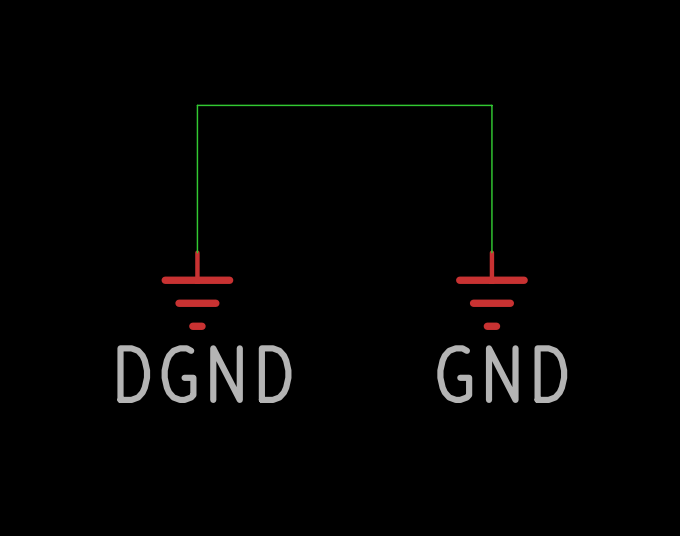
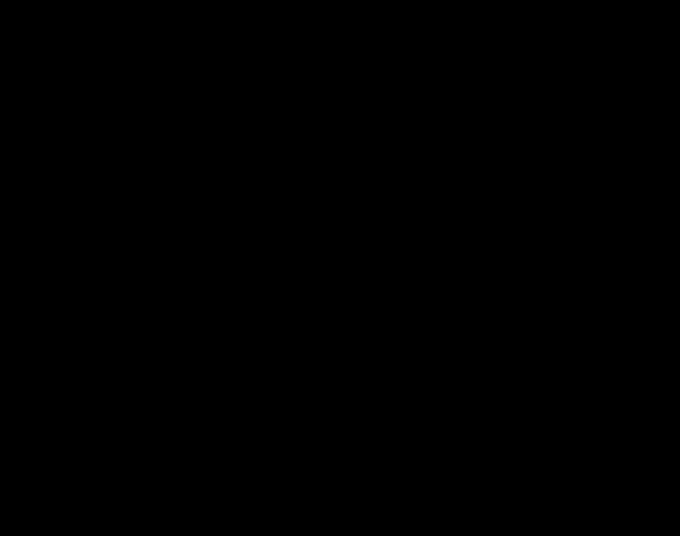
wire: (197, 252) (197, 105) (491, 105) (491, 252) -> none
power symbol: DGND (197, 290) -> none
power symbol: GND (491, 290) -> none

